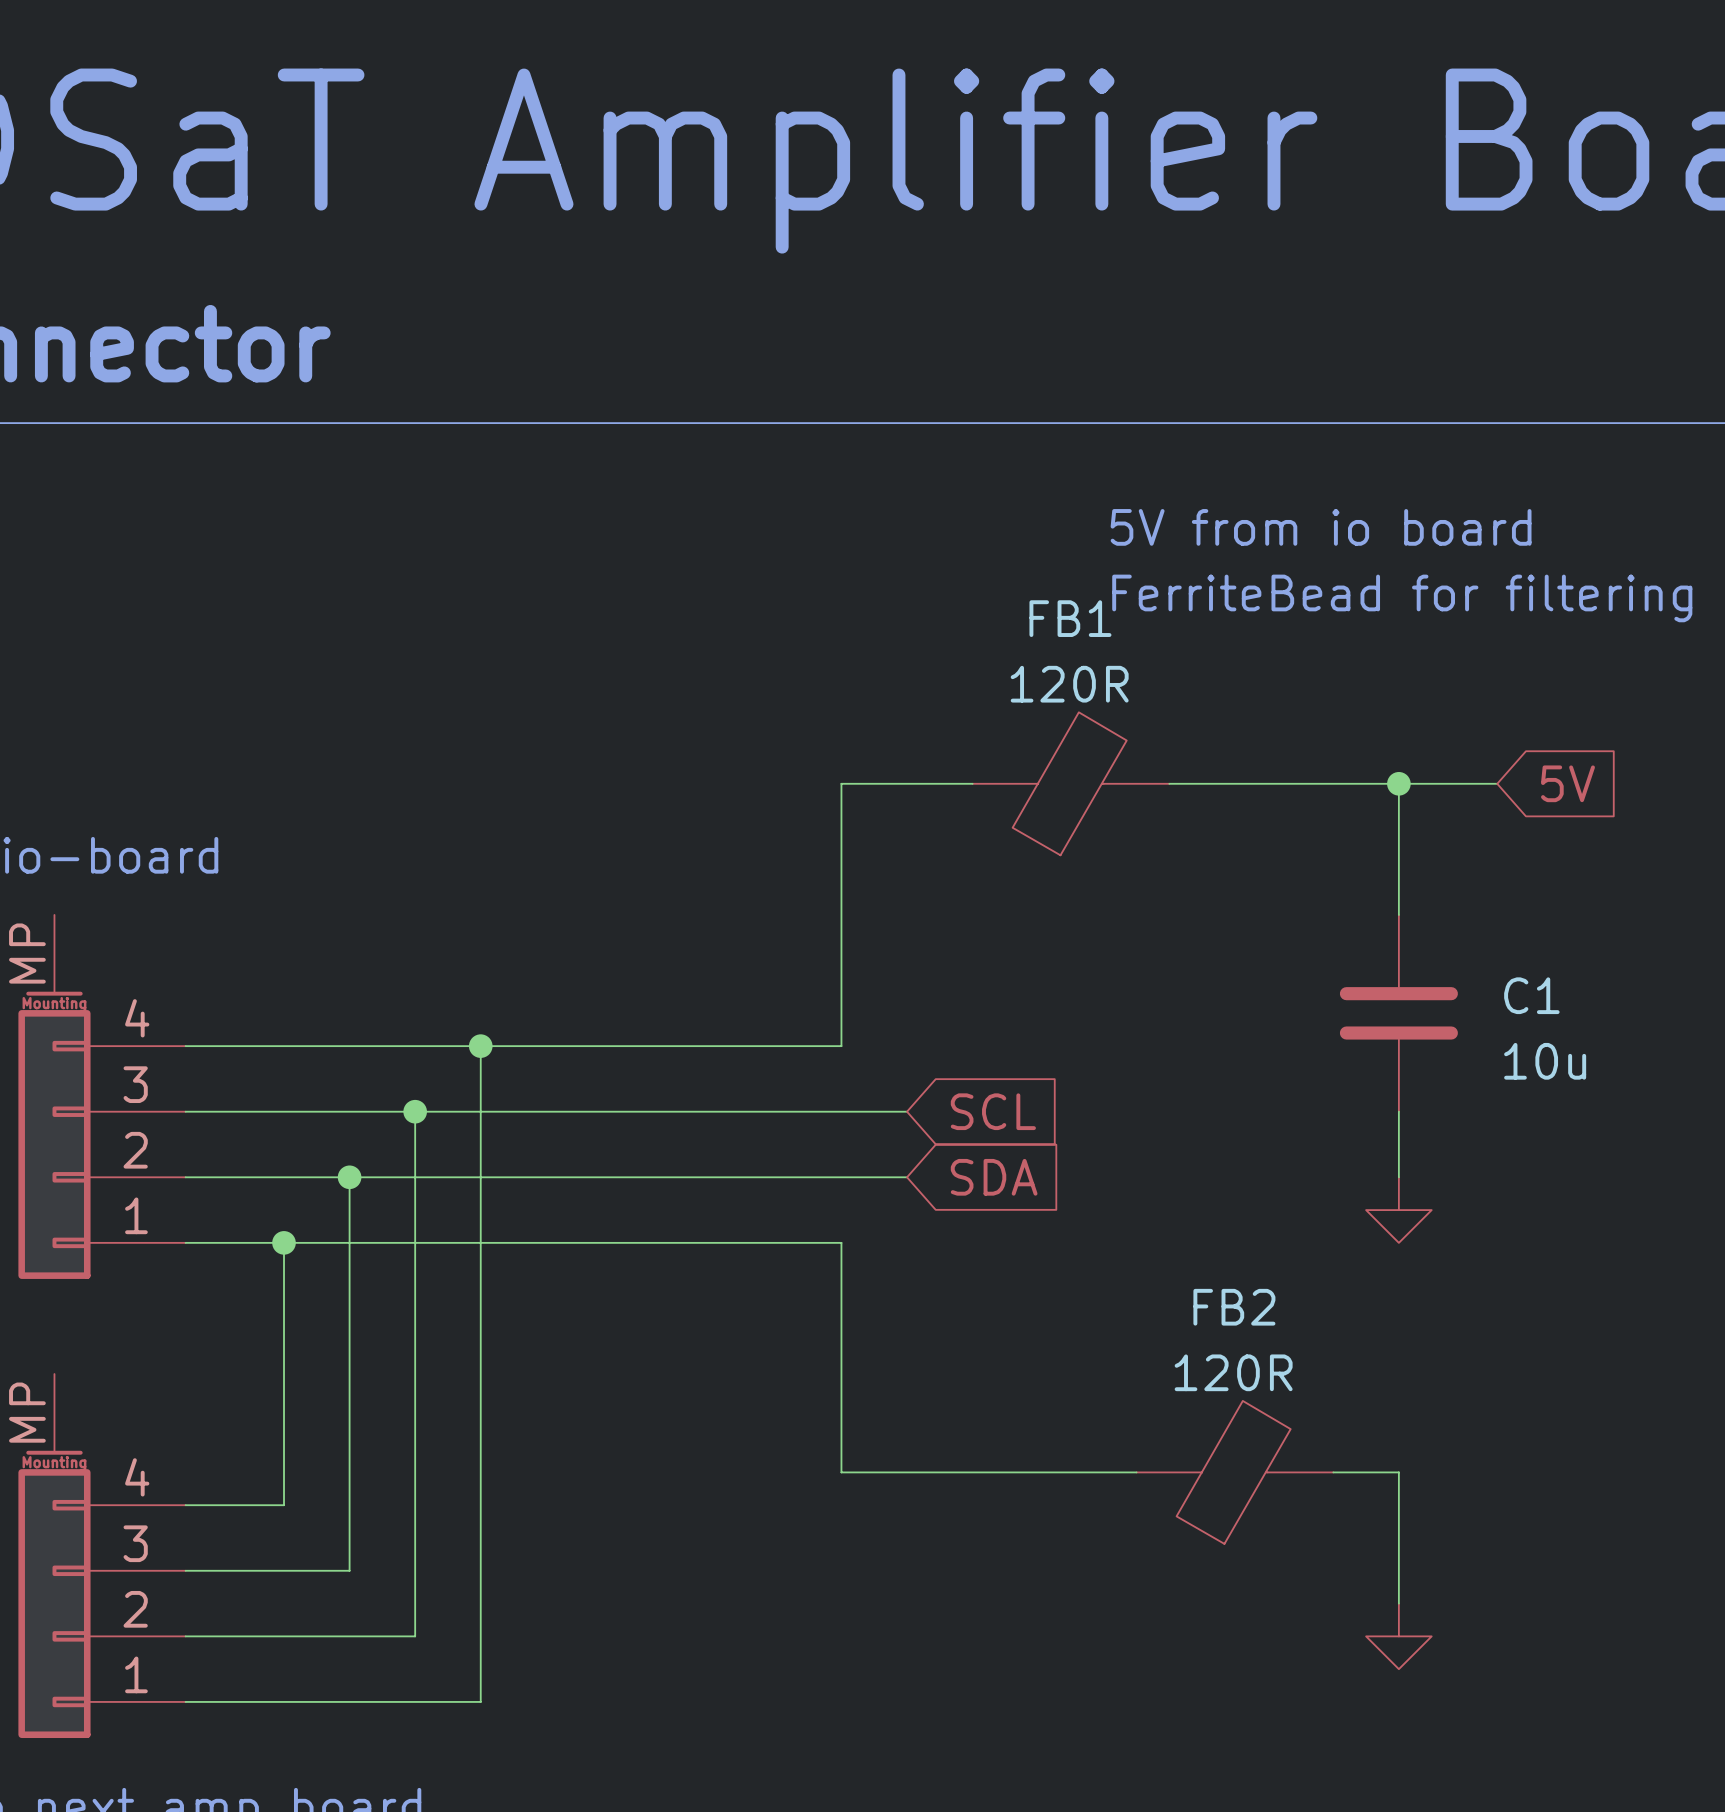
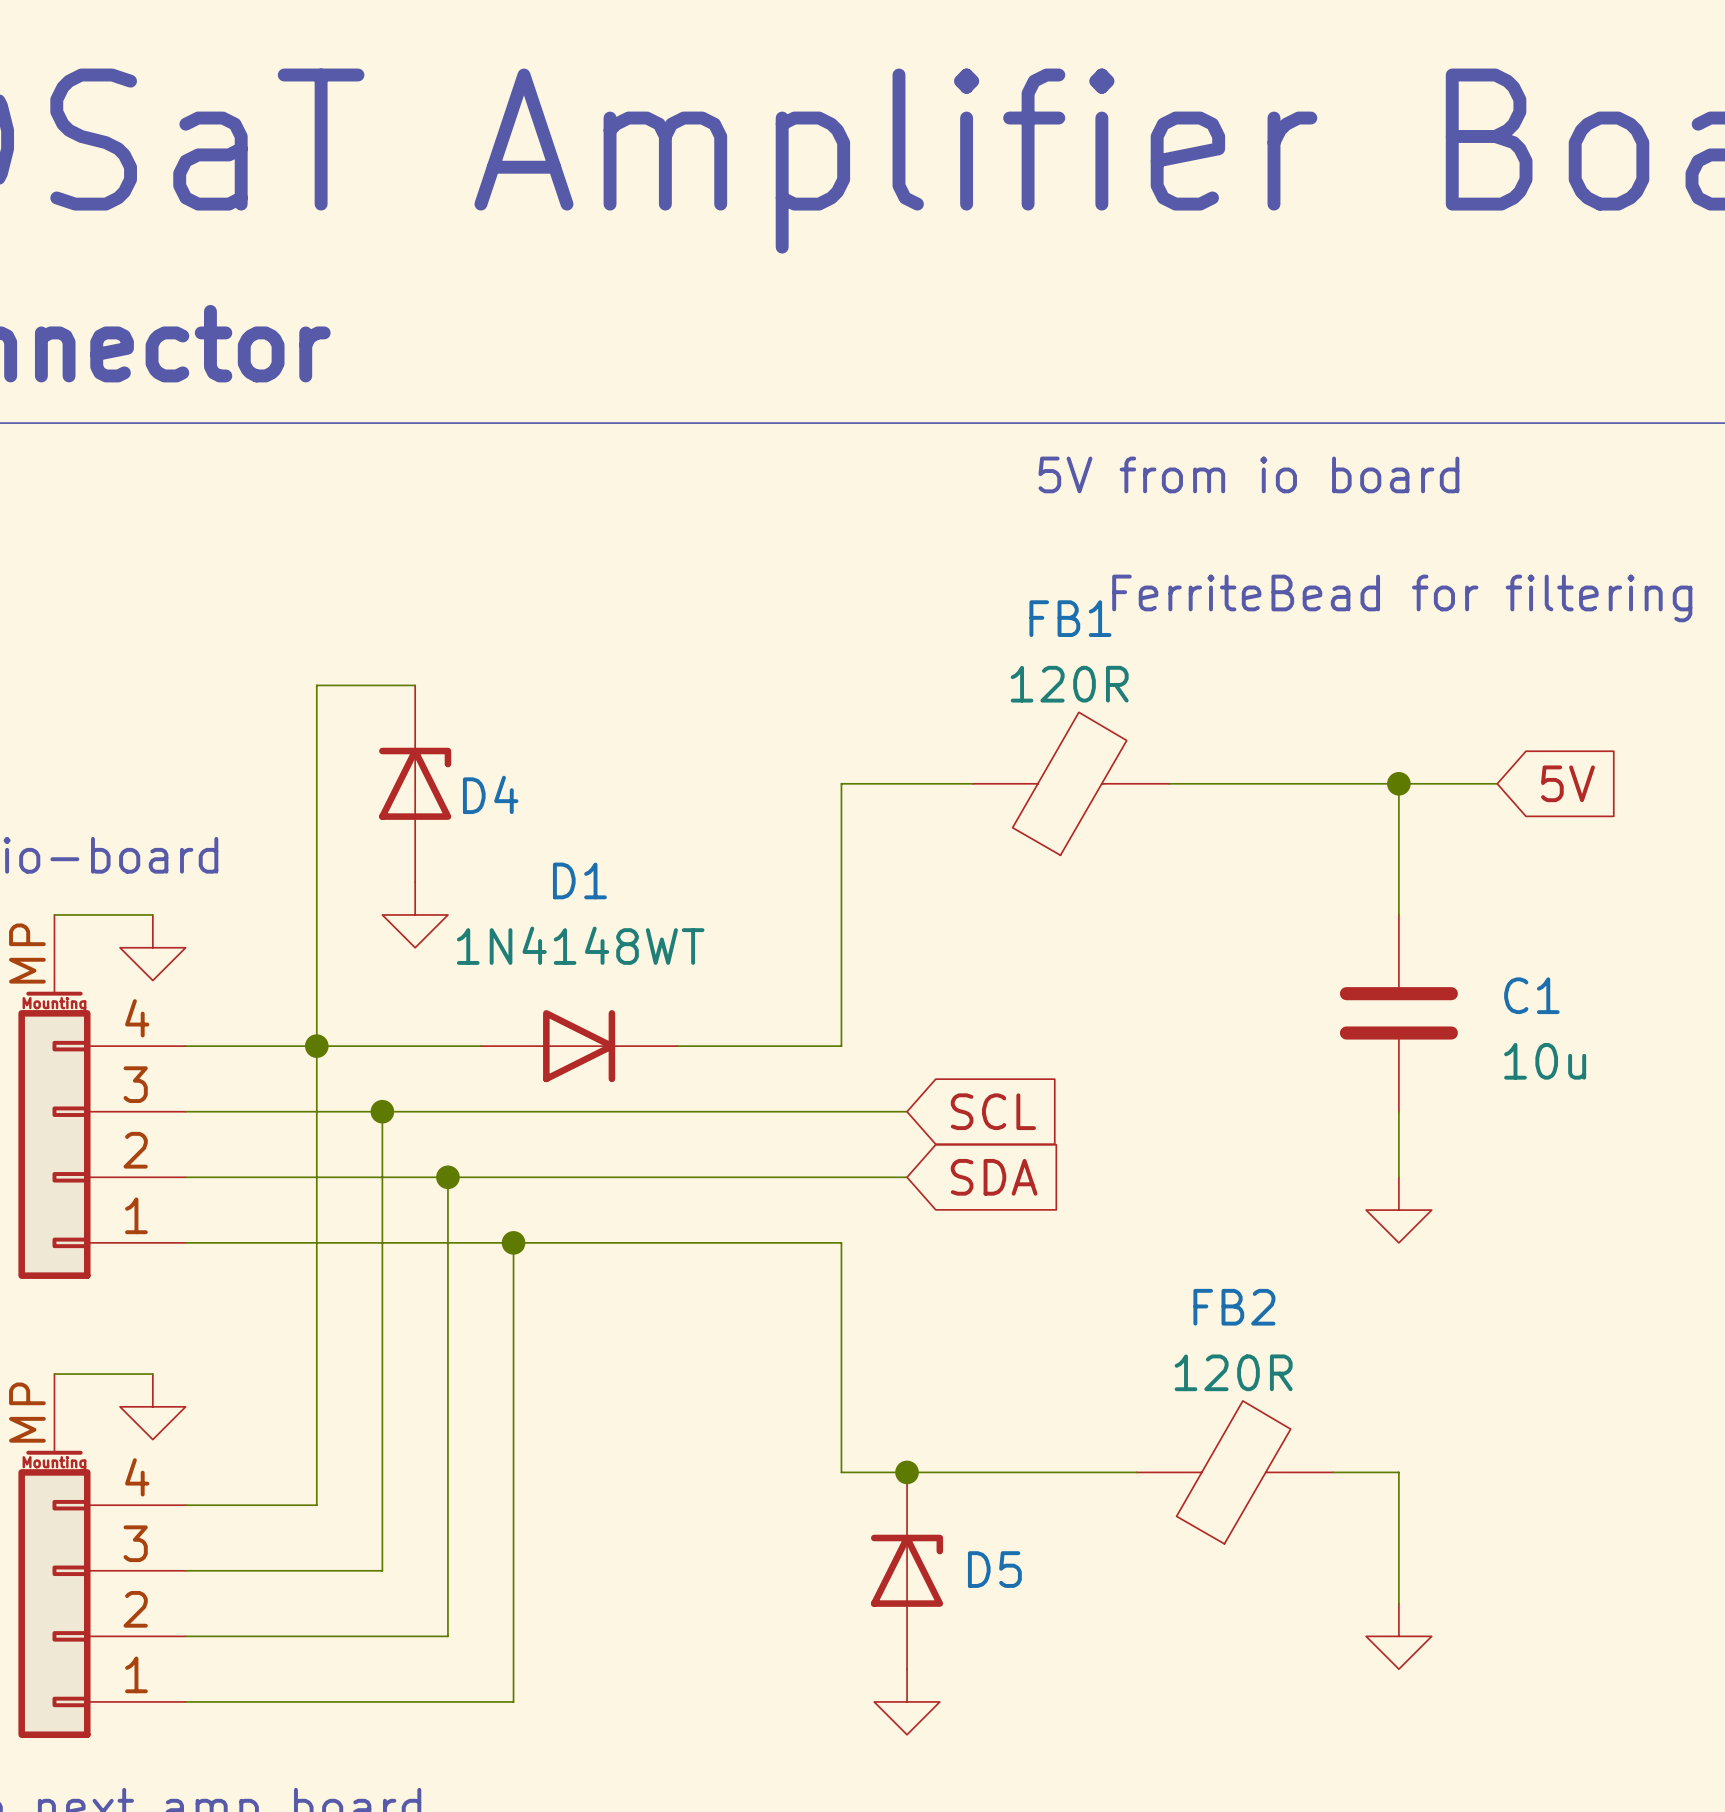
text position: 5V from io board (1321, 527) -> 5V from io board (1248, 474)
D4: none -> (415, 783)
wire: none -> (54, 914) (152, 914)
power symbol: none -> (415, 914)
power symbol: none -> (152, 947)
junction: none -> (316, 1046)
junction: (480, 1046) -> none
D1: none -> 1N4148WT (579, 1046)
wire: (677, 1046) (480, 1046) (480, 1701) -> (513, 1242) (513, 1701) (480, 1701)
wire: (415, 1111) (415, 1636) -> (447, 1177) (447, 1636) (415, 1636)
junction position: (415, 1111) -> (382, 1111)
wire: (349, 1177) (349, 1570) -> (382, 1111) (382, 1570) (349, 1570)
junction: (349, 1177) -> none
junction: none -> (447, 1177)
wire: (284, 1242) (284, 1505) -> (415, 685) (316, 685) (316, 1505) (284, 1505)
junction: (284, 1242) -> none
junction: none -> (513, 1242)
wire: none -> (54, 1374) (152, 1374)
power symbol: none -> (152, 1406)
junction: none -> (907, 1472)
D5: none -> (907, 1570)
power symbol: none -> (907, 1701)

